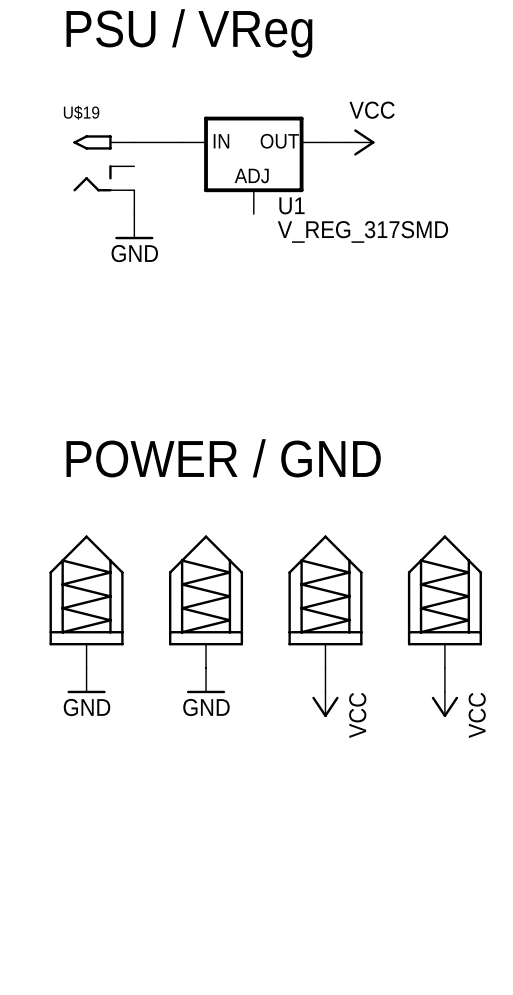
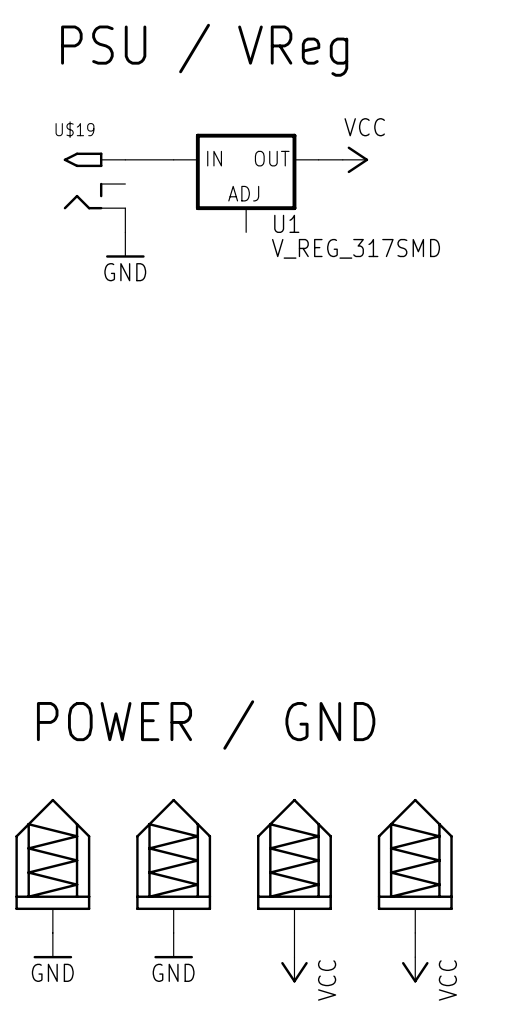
text: POWER / GND (223, 458) -> none
part: (86, 601) -> none
part: (206, 601) -> none
part: (325, 601) -> none
part: (444, 601) -> none
wire: (325, 668) (325, 691) -> none
wire: (444, 668) (444, 691) -> none
power symbol: GND (86, 680) -> none
power symbol: GND (206, 680) -> none
text: none -> POWER / GND (206, 725)
power symbol: VCC (325, 704) -> none
power symbol: VCC (444, 704) -> none
part: none -> (52, 865)
part: none -> (173, 865)
part: none -> (294, 865)
part: none -> (415, 865)
wire: none -> (294, 932) (294, 957)
wire: none -> (415, 932) (415, 957)
power symbol: none -> GND (52, 945)
power symbol: none -> GND (173, 945)
power symbol: none -> VCC (294, 969)
power symbol: none -> VCC (415, 969)

